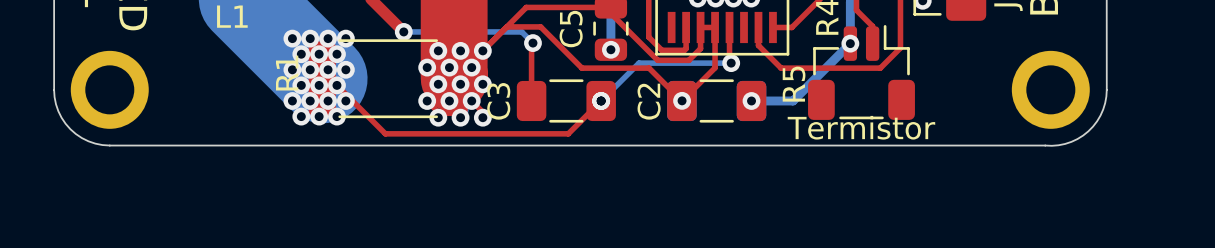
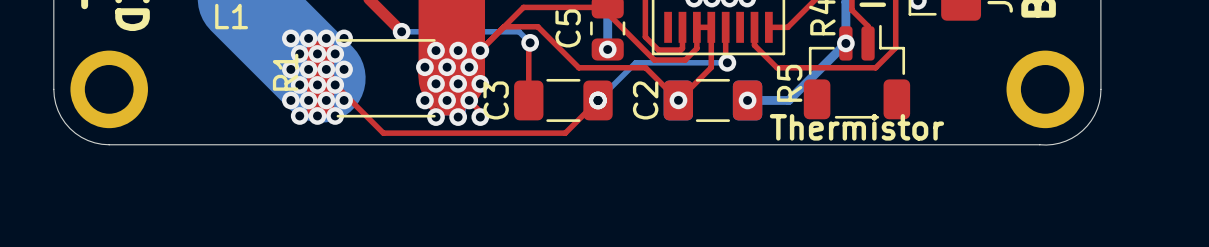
text: Termistor (861, 127) -> Thermistor (856, 127)

